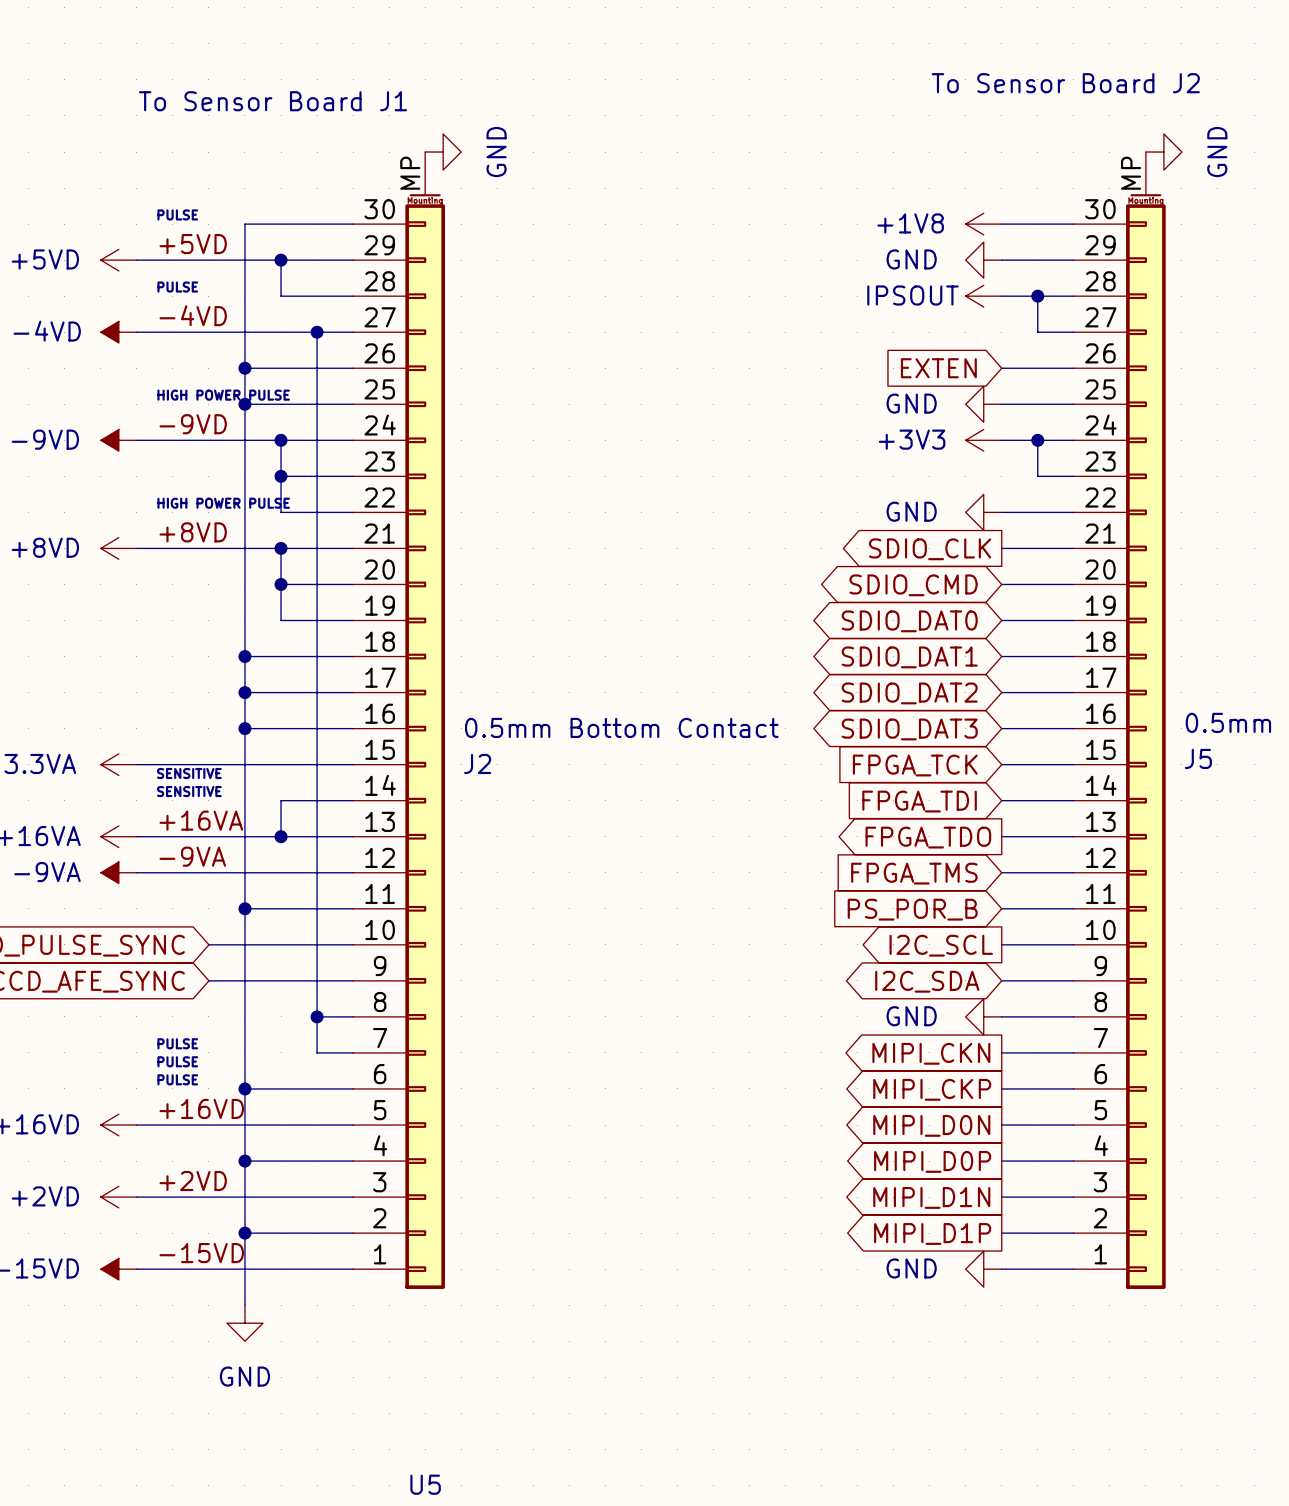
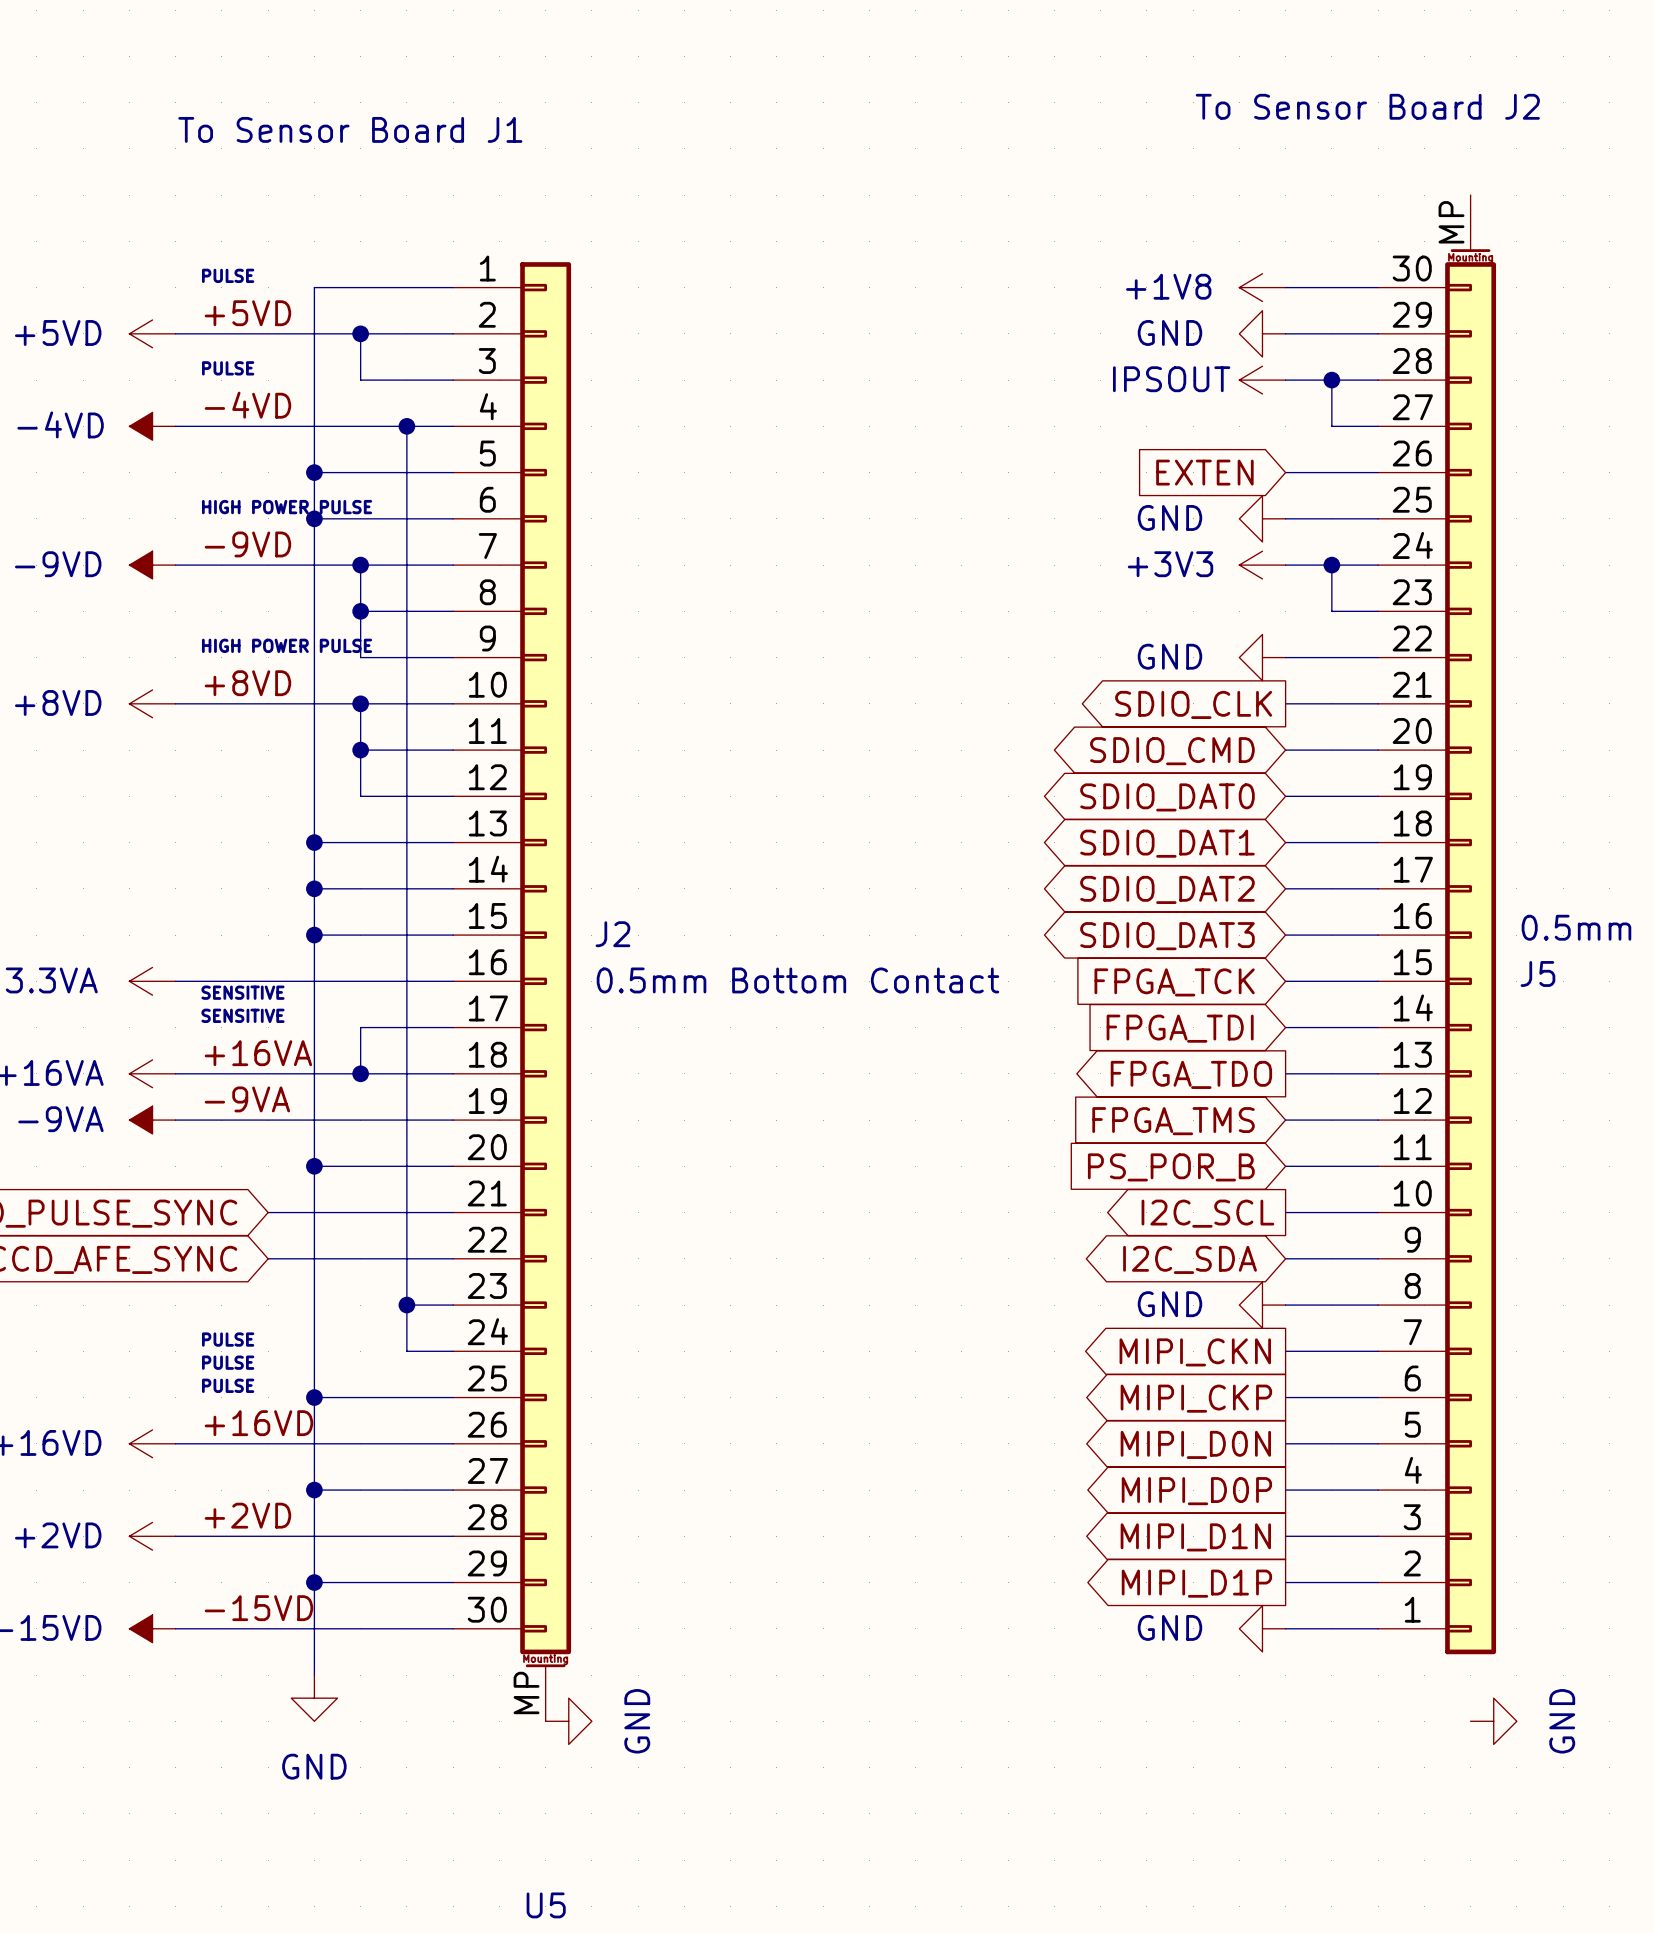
power symbol: GND (443, 152) -> none
power symbol: GND (1163, 152) -> none
J2 flip: as is (425, 741) -> up-down (545, 964)
power symbol: none -> GND (568, 1721)
power symbol: none -> GND (1493, 1721)

